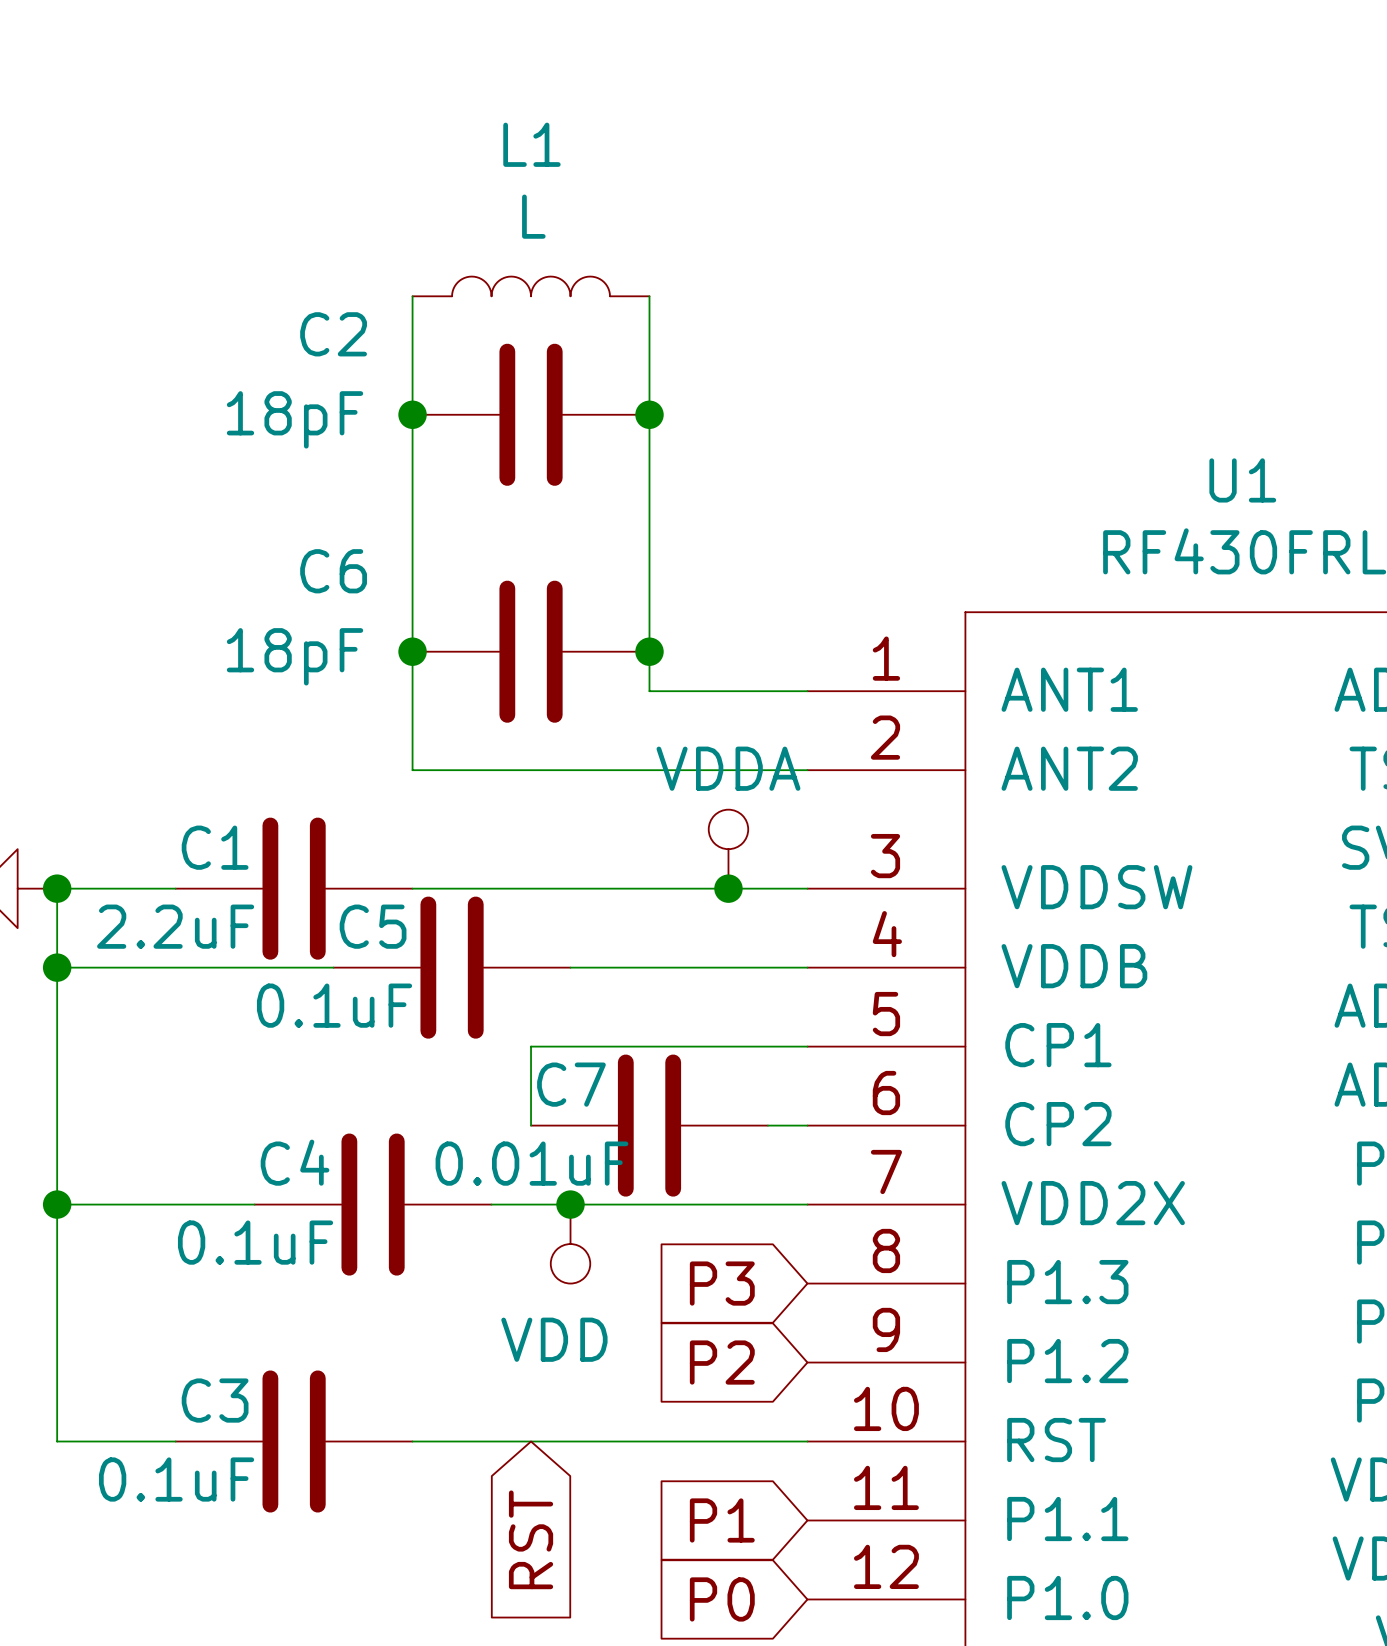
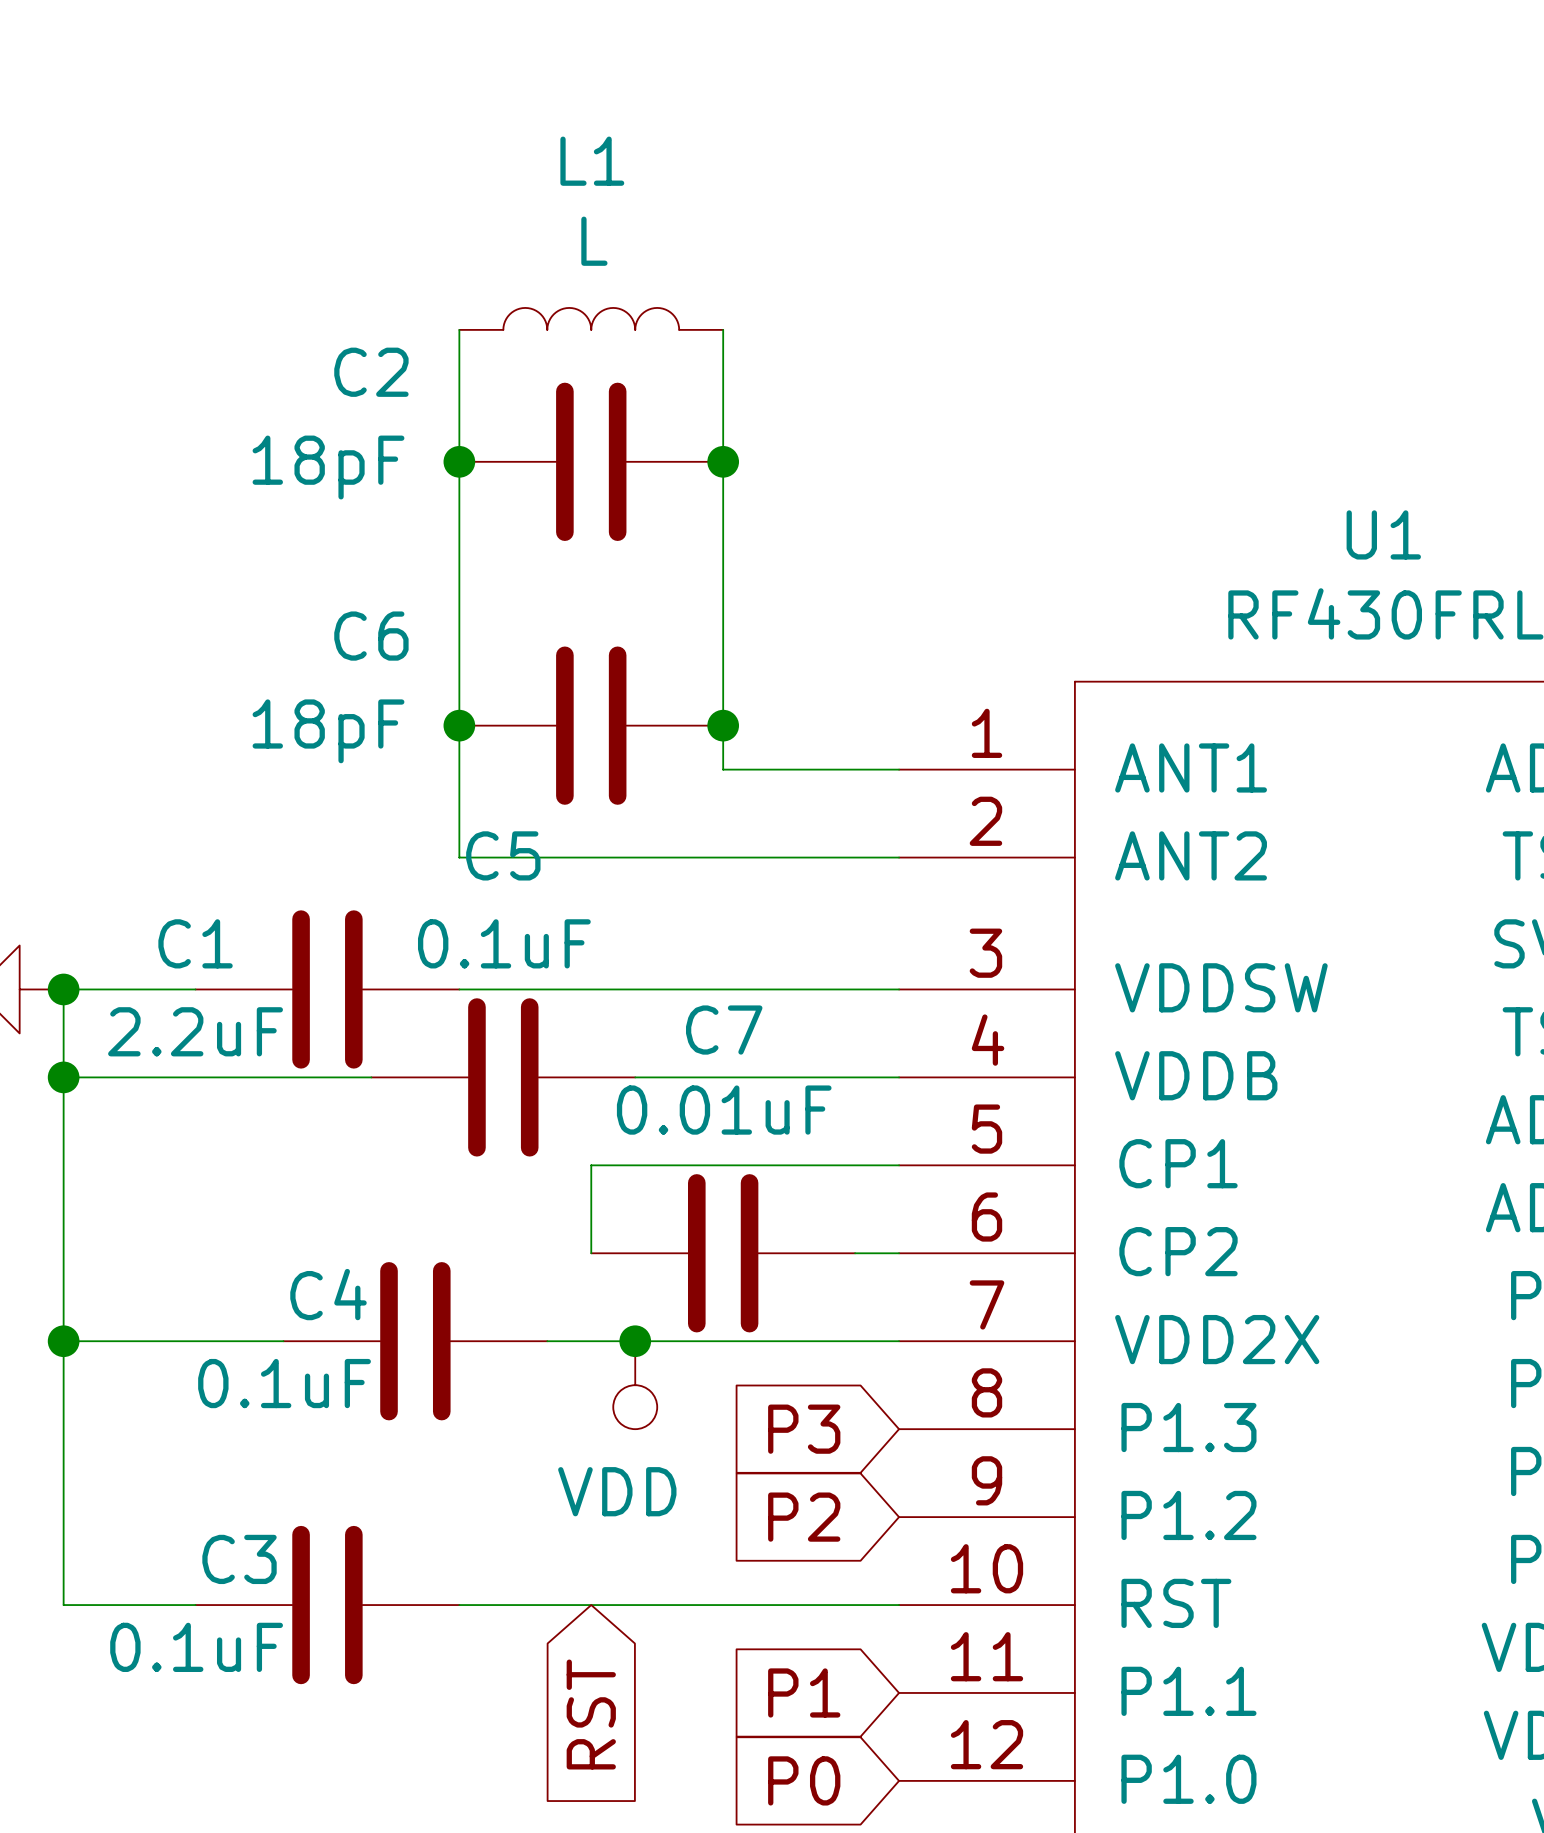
C1 name position: C1 (215, 847) -> C1 (195, 943)
power symbol: VDDA (728, 849) -> none
junction: (728, 888) -> none
C5 name position: C5 (373, 926) -> C5 (503, 855)
C5 value position: 0.1uF (334, 1005) -> 0.1uF (504, 943)
C7 name position: C7 (571, 1084) -> C7 (724, 1030)
C7 value position: 0.01uF (531, 1163) -> 0.01uF (724, 1110)

